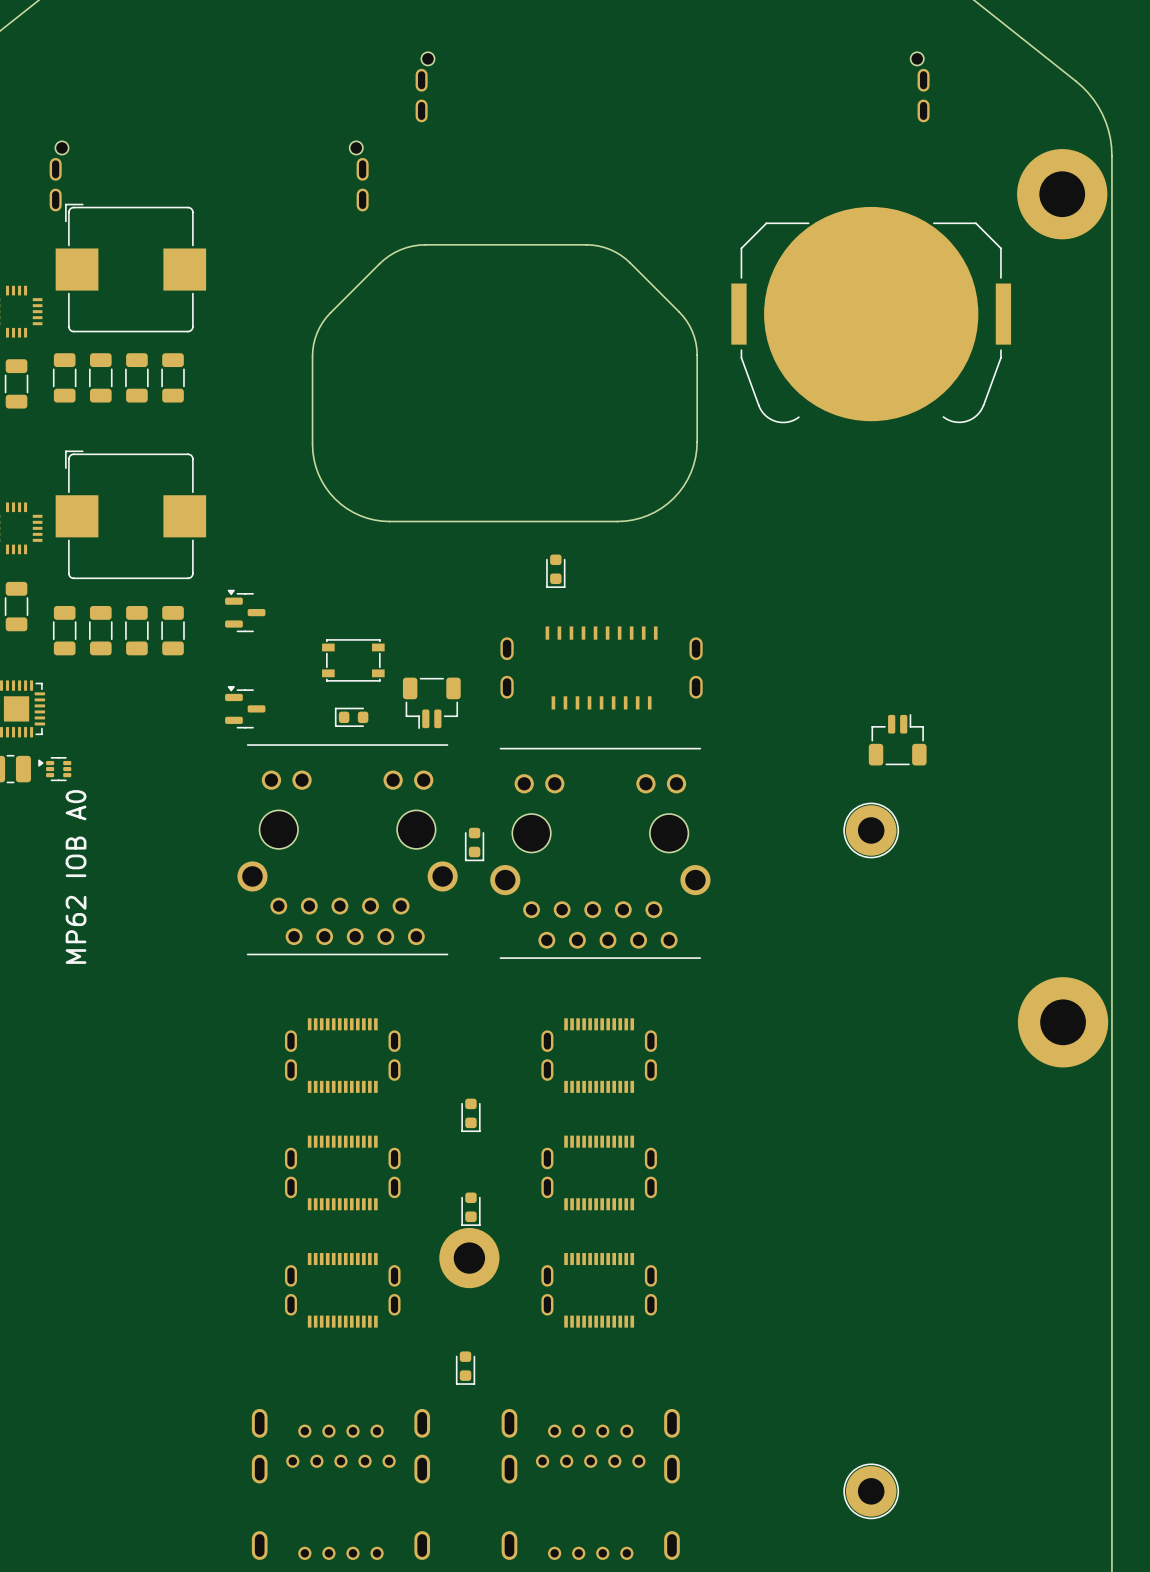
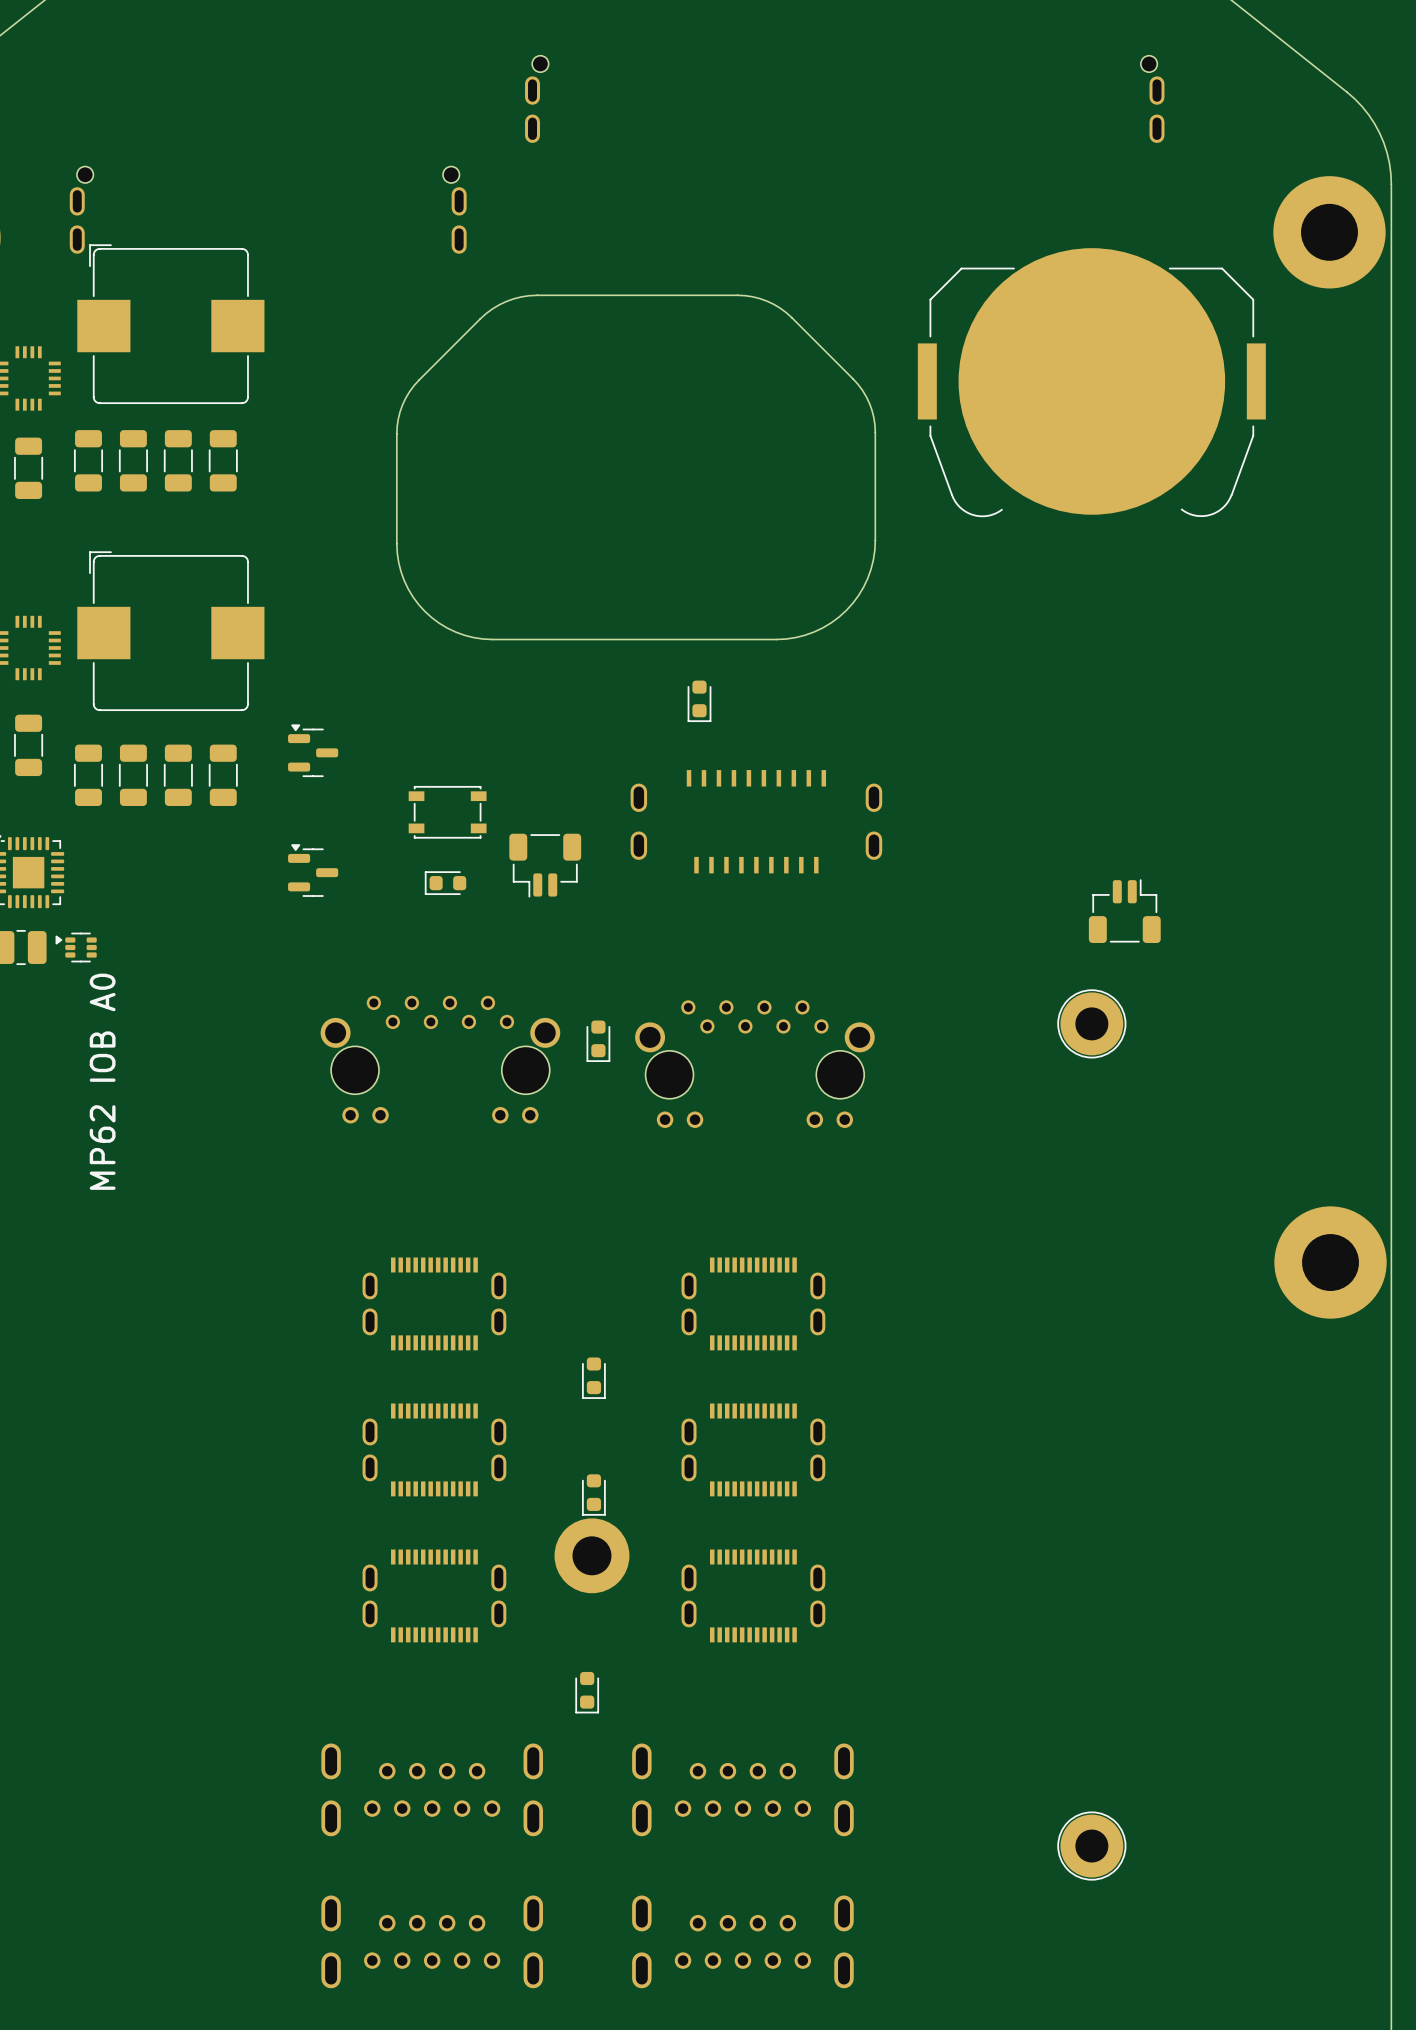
part footprint: [237, 744, 458, 956] -> [320, 995, 561, 1124]
part footprint: [490, 747, 711, 959] -> [635, 1000, 875, 1128]

